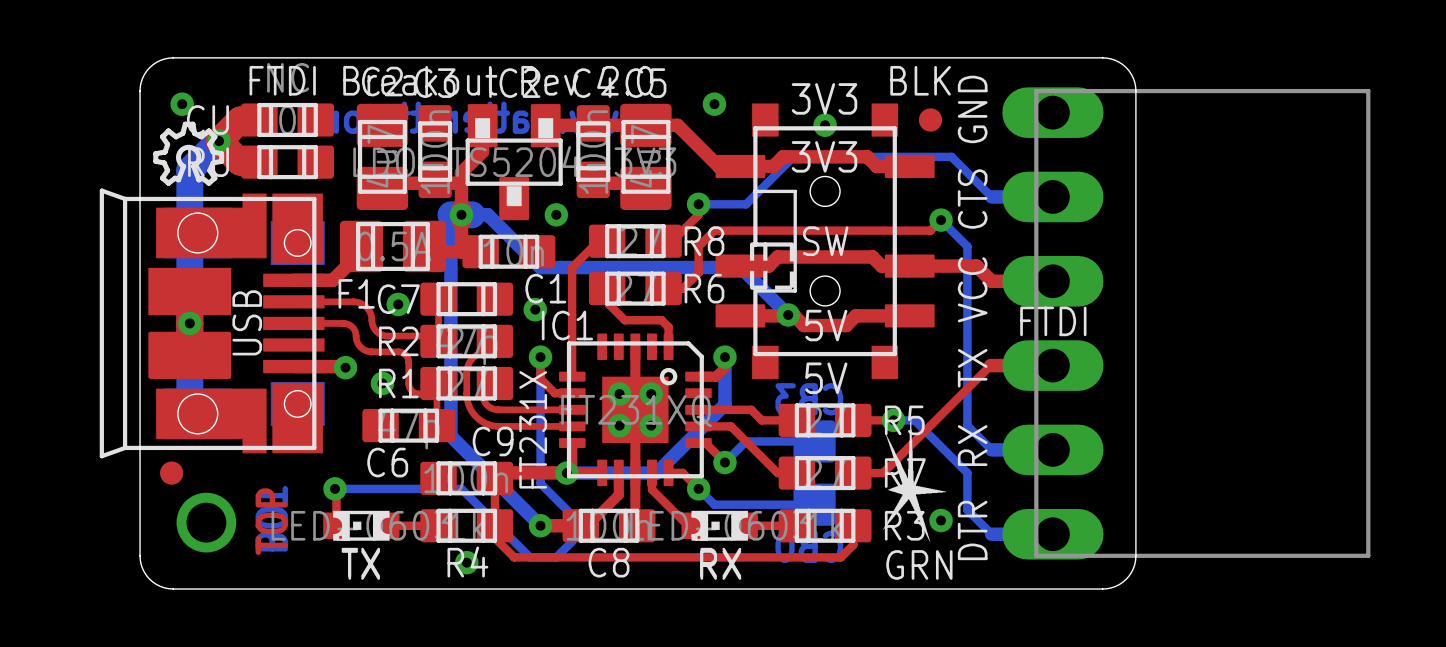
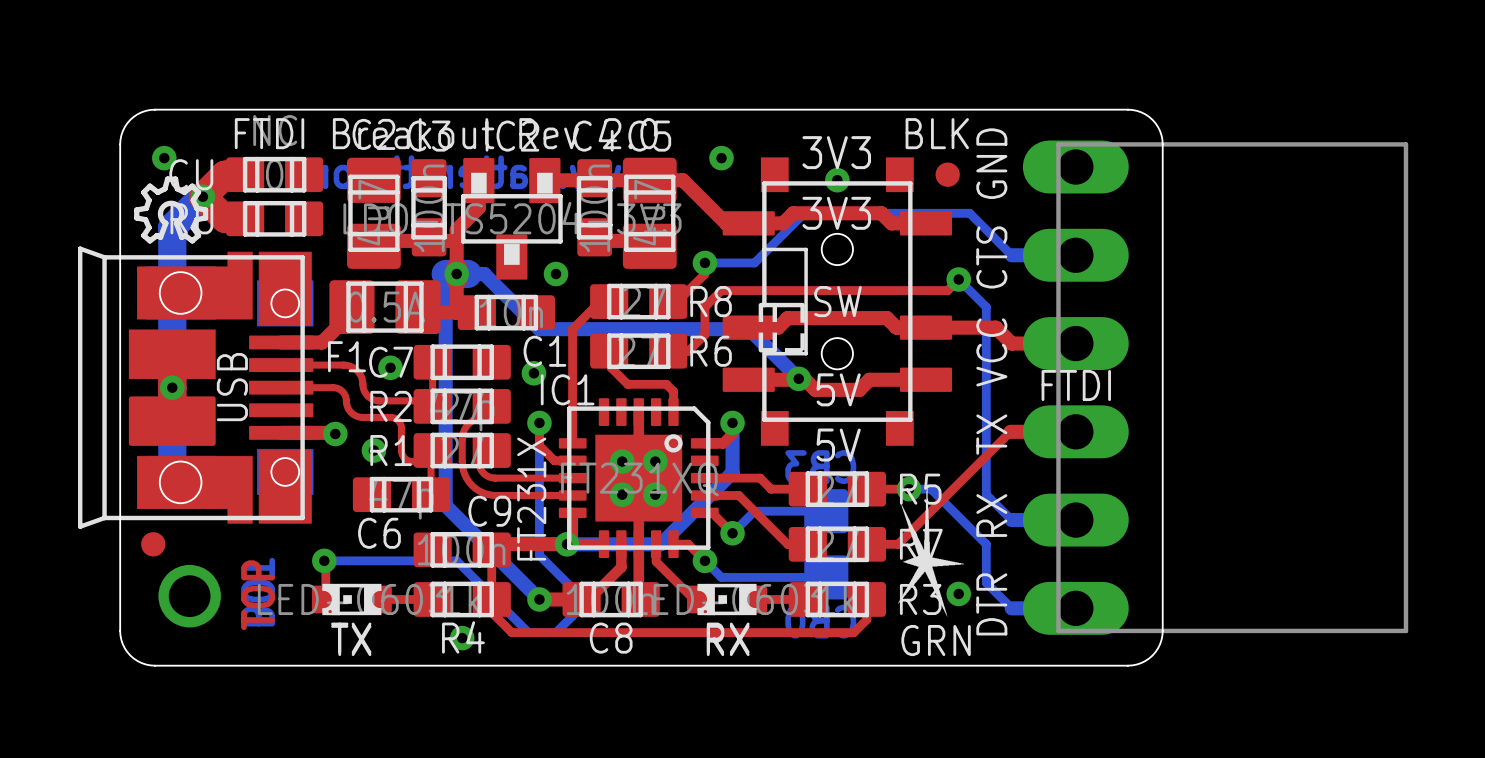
IC1 footprint: [559, 333, 712, 487] -> [558, 398, 719, 559]

